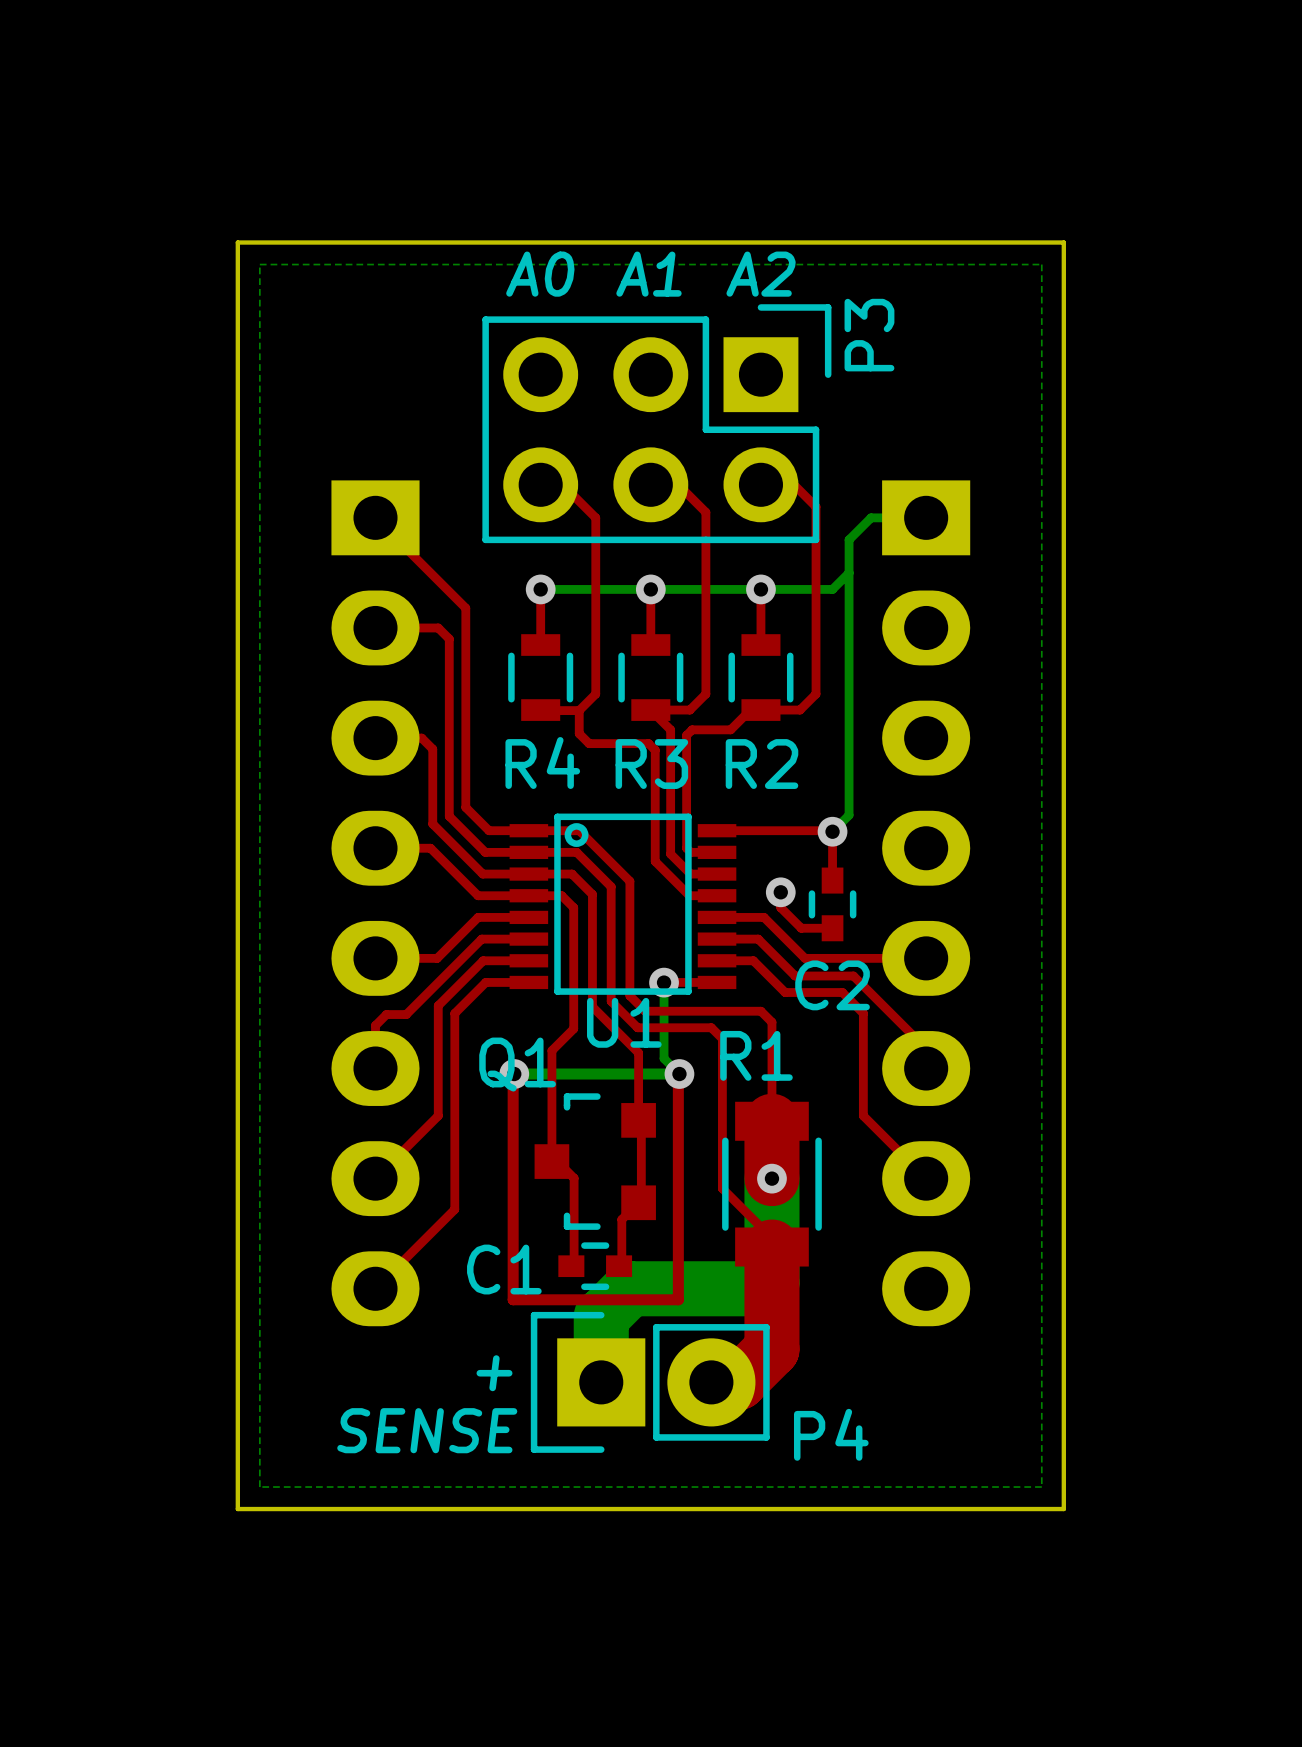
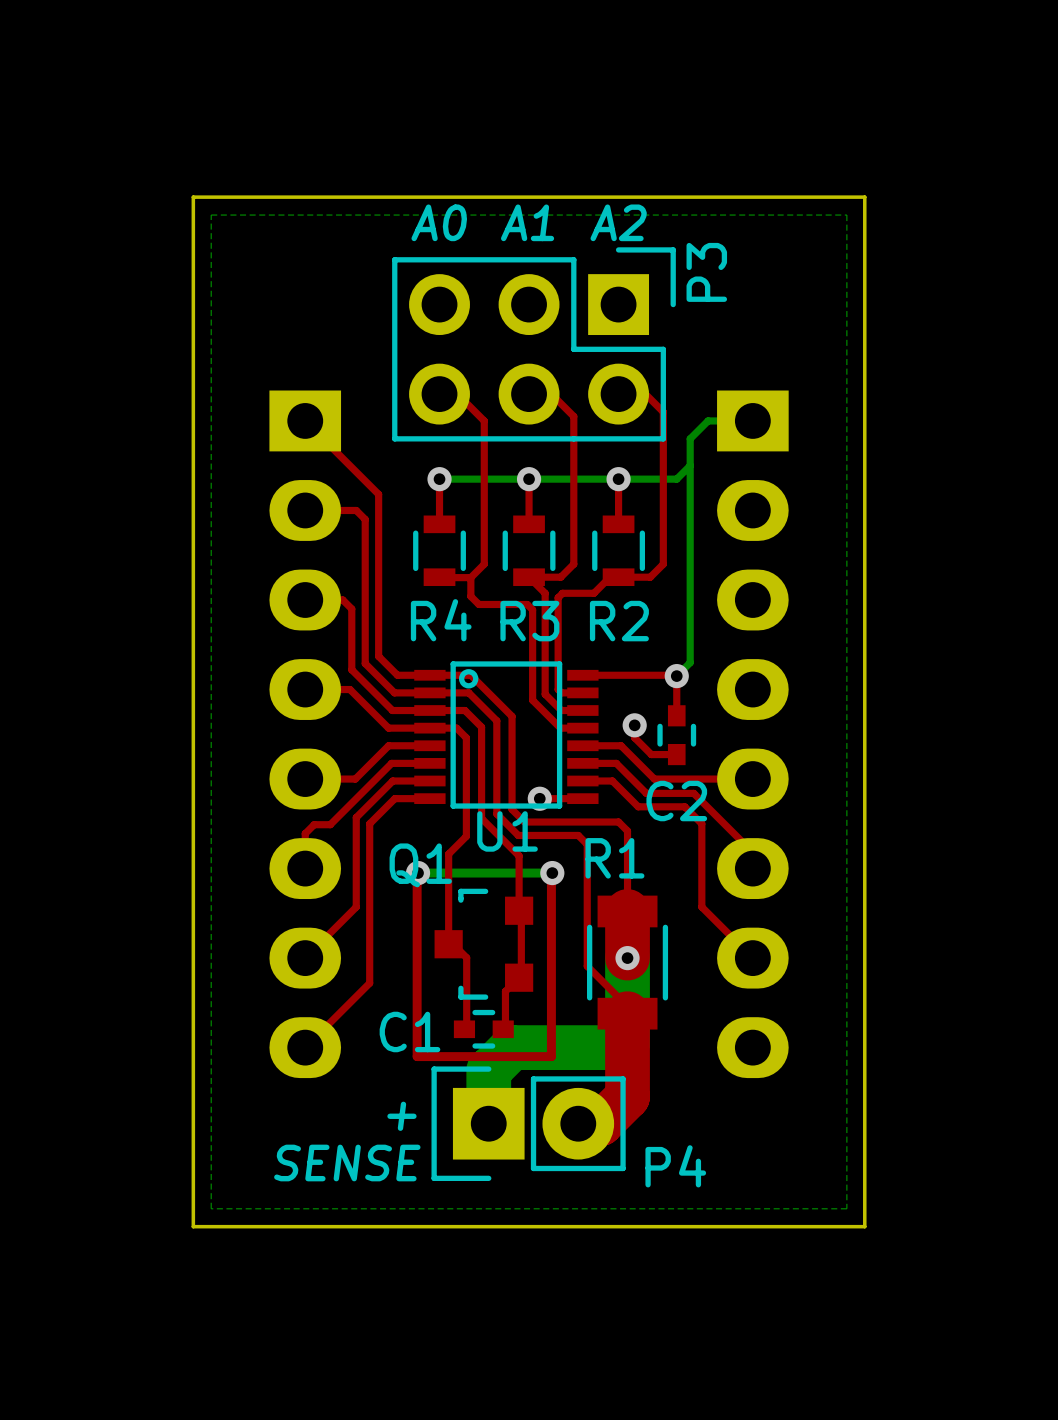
bottom track: (664, 982) (664, 1058) (679, 1074) -> none

